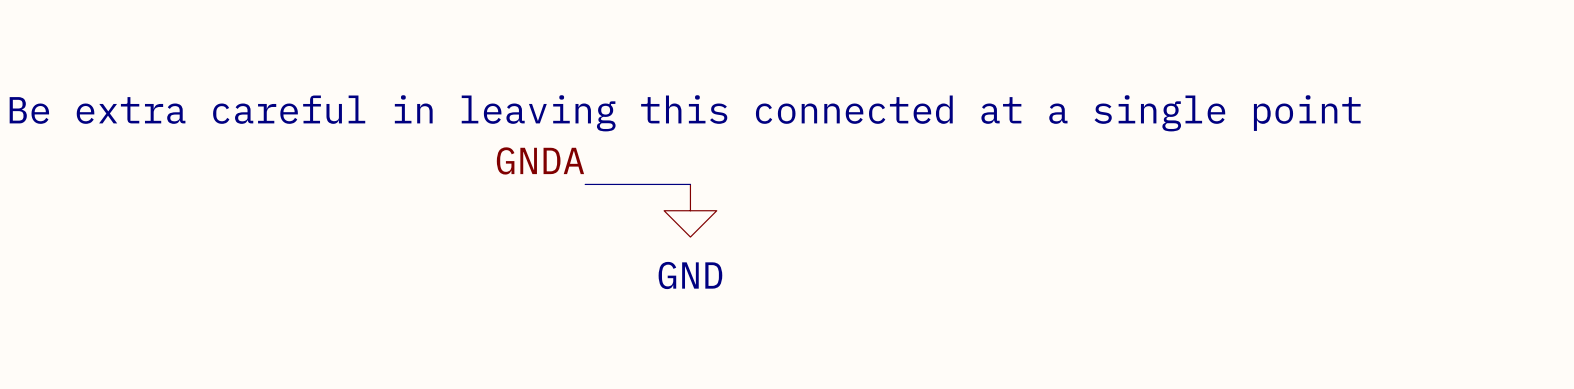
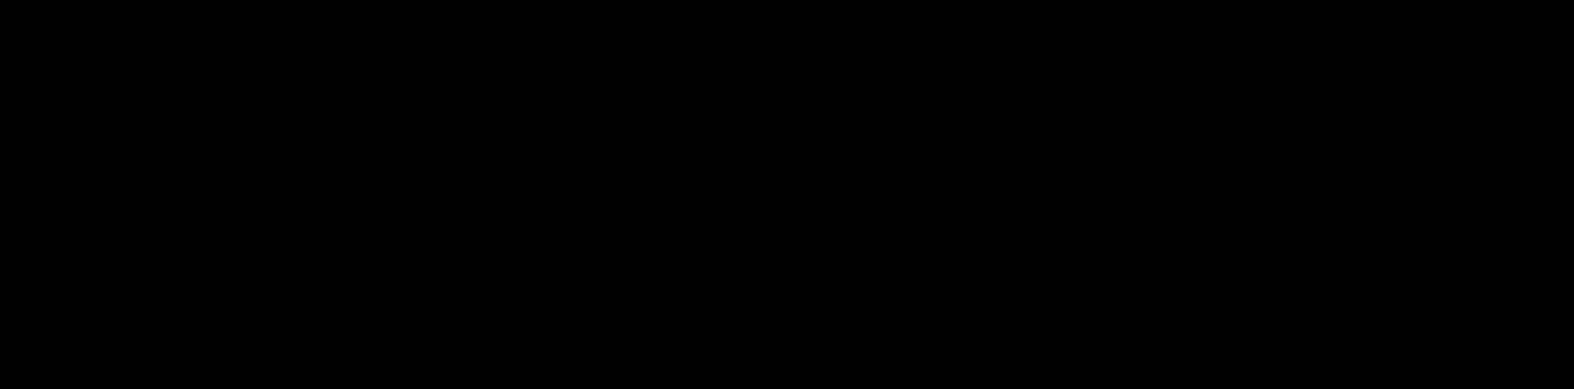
text: Be extra careful in leaving this connected at a single point (685, 113) -> none
label: GNDA (540, 160) -> none
wire: (585, 184) (690, 184) -> none
power symbol: GND (690, 210) -> none

